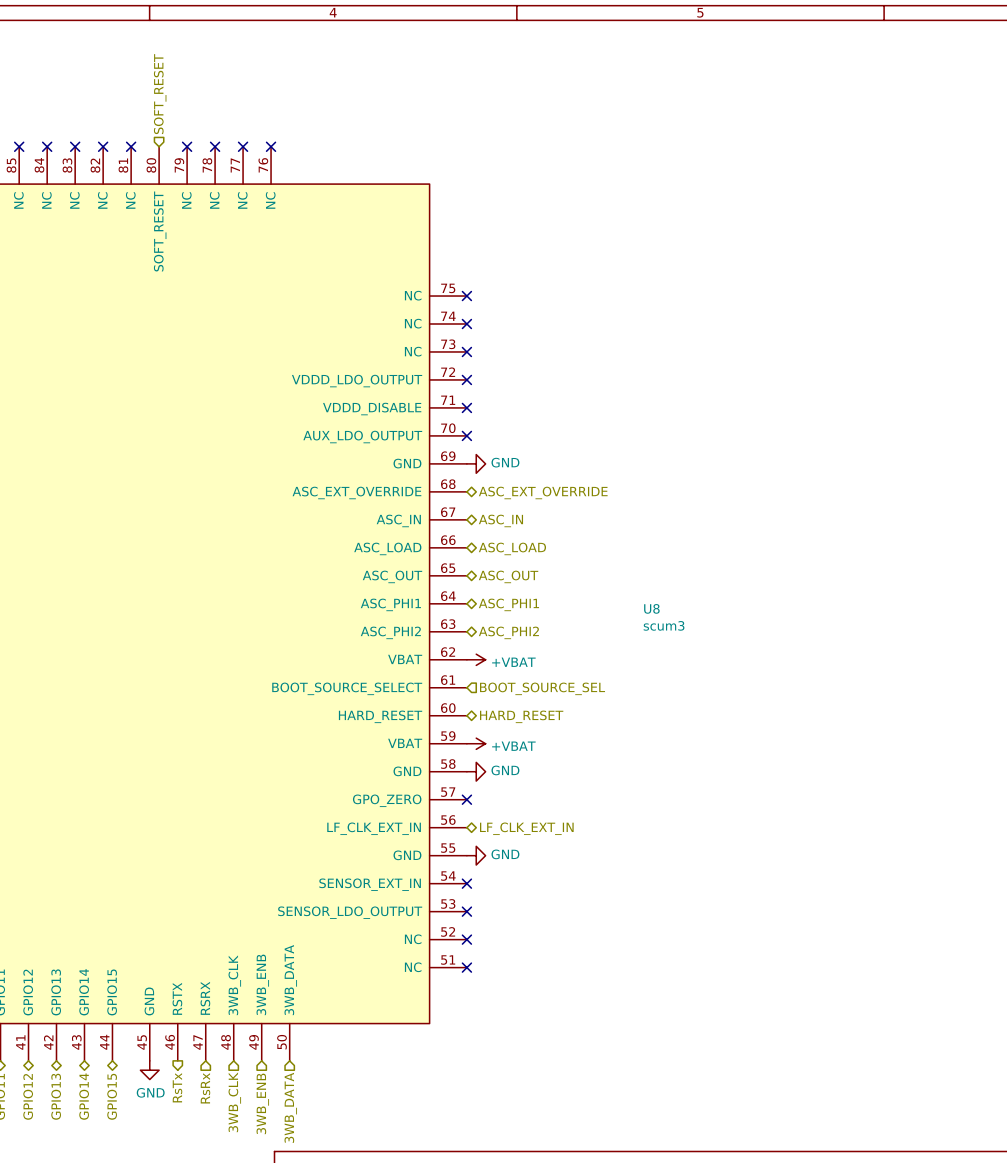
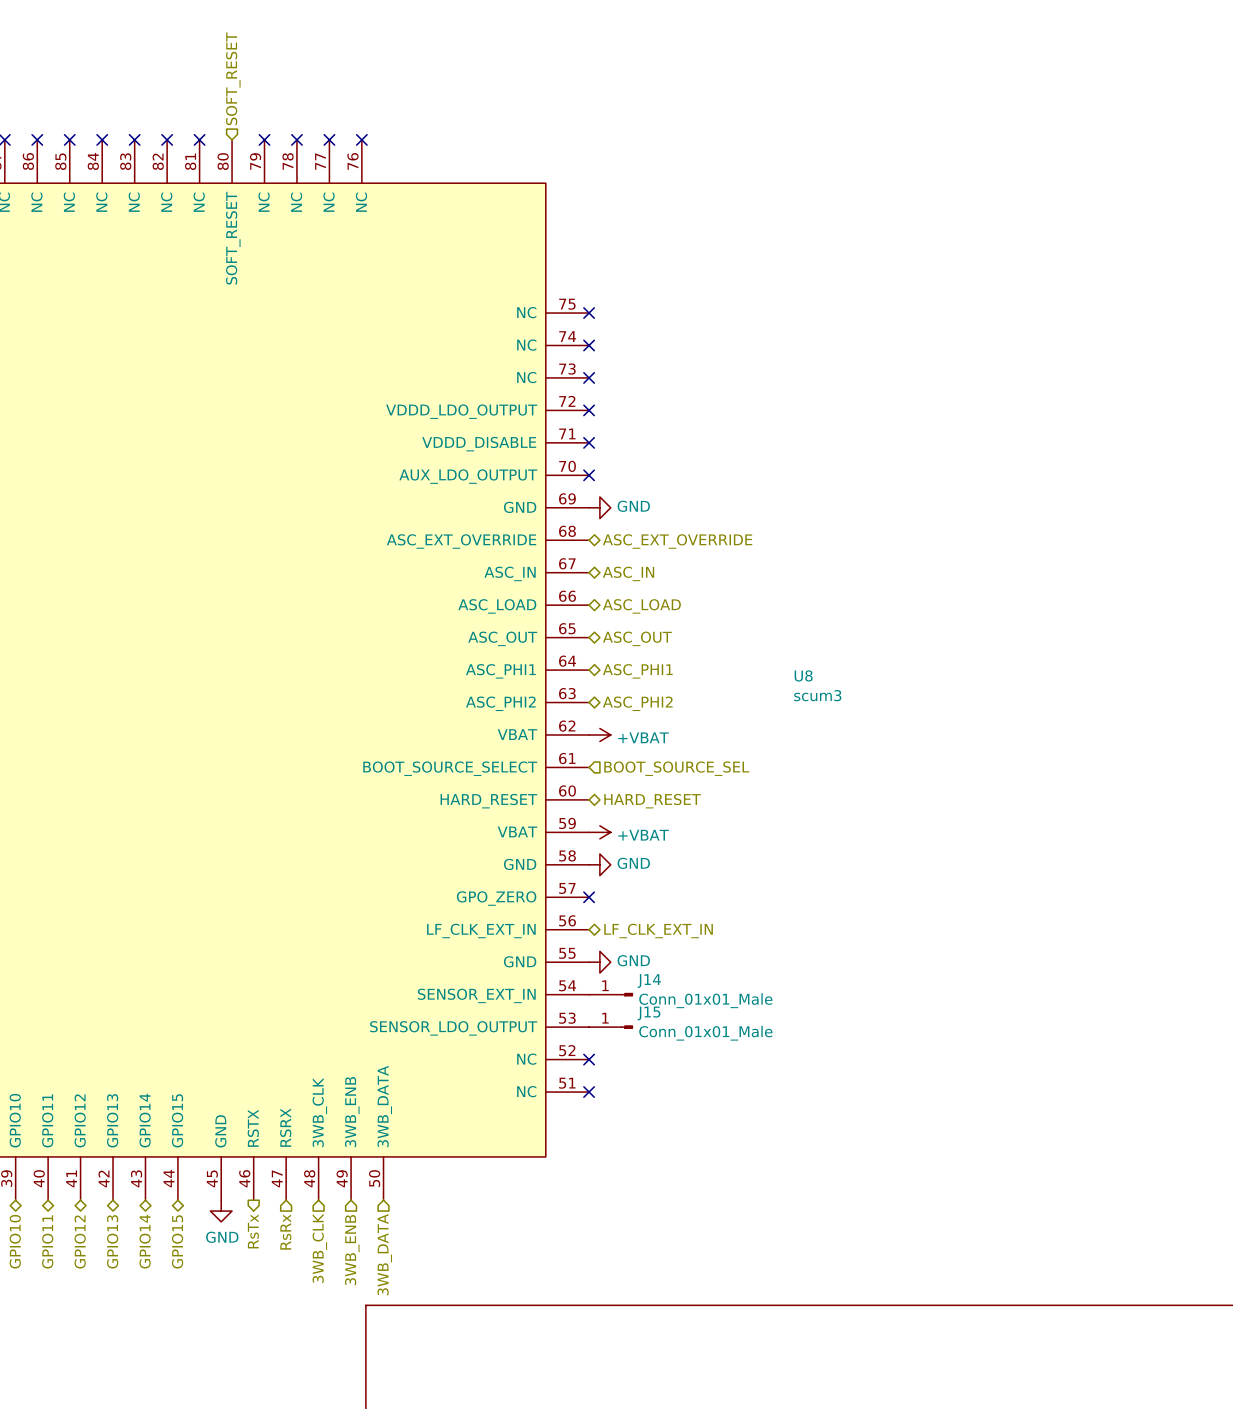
no-connect mark: (466, 883) -> none
J14: none -> Conn_01x01_Male (611, 994)
no-connect mark: (466, 911) -> none
J15: none -> Conn_01x01_Male (611, 1027)

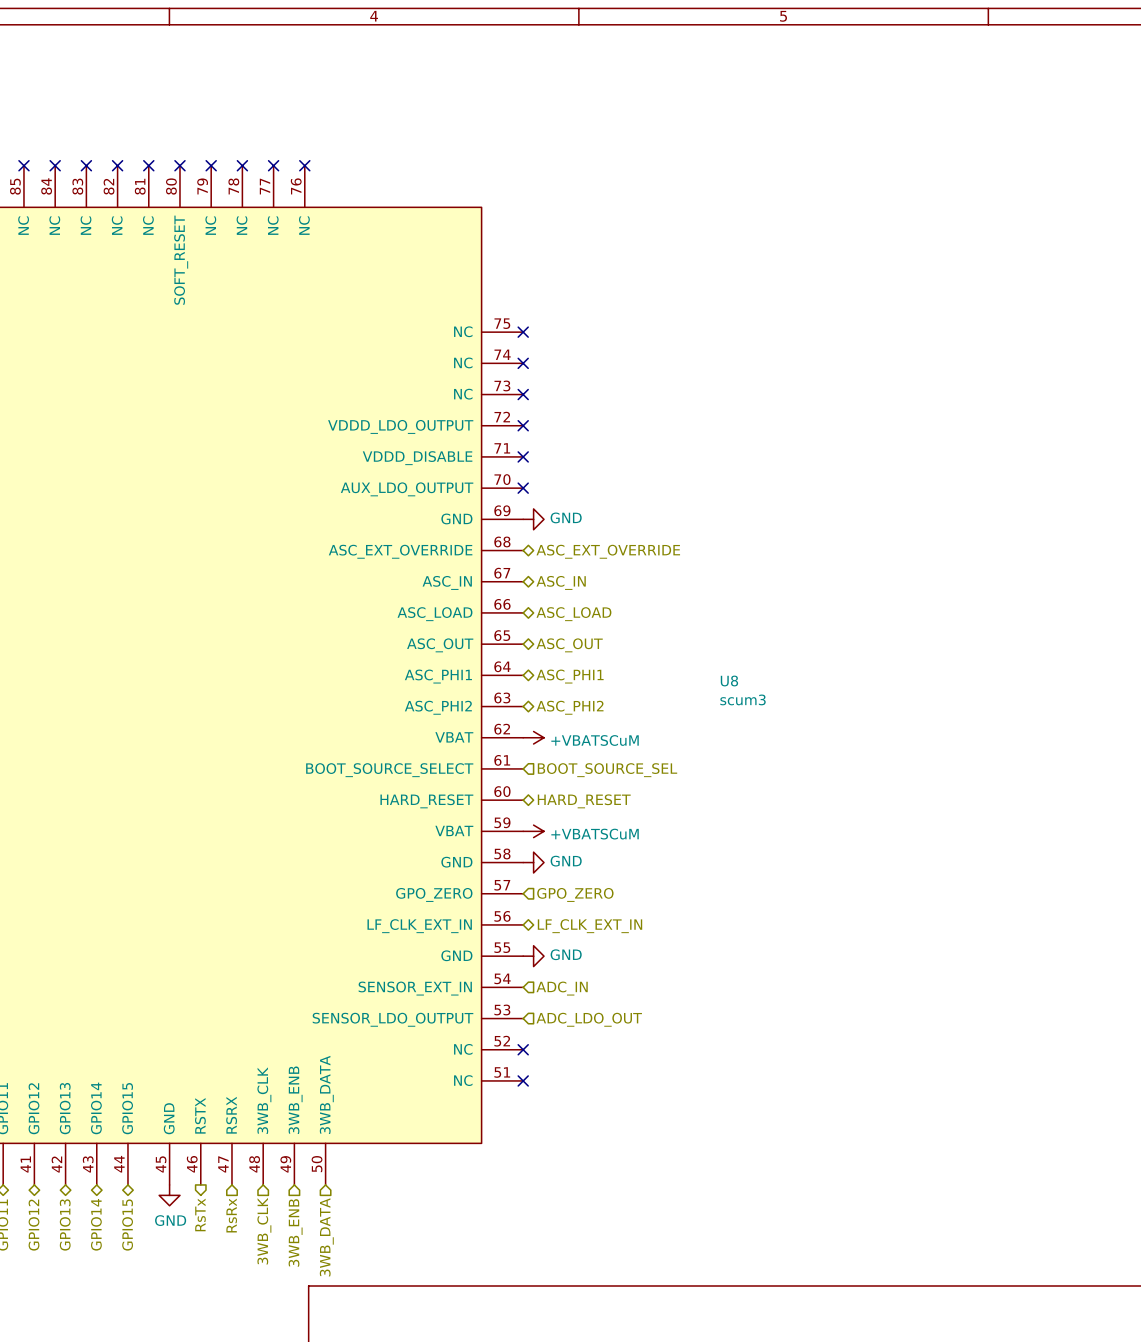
hierarchical label: SOFT_RESET (233, 78) -> none
no-connect mark: none -> (179, 165)
power symbol: +VBAT (599, 734) -> +VBATSCuM (533, 737)
power symbol: +VBAT (599, 832) -> +VBATSCuM (533, 831)
no-connect mark: (589, 897) -> none
hierarchical label: none -> GPO_ZERO (575, 894)
J14: Conn_01x01_Male (611, 994) -> none
hierarchical label: none -> ADC_IN (562, 988)
J15: Conn_01x01_Male (611, 1027) -> none
hierarchical label: none -> ADC_LDO_OUT (589, 1019)

